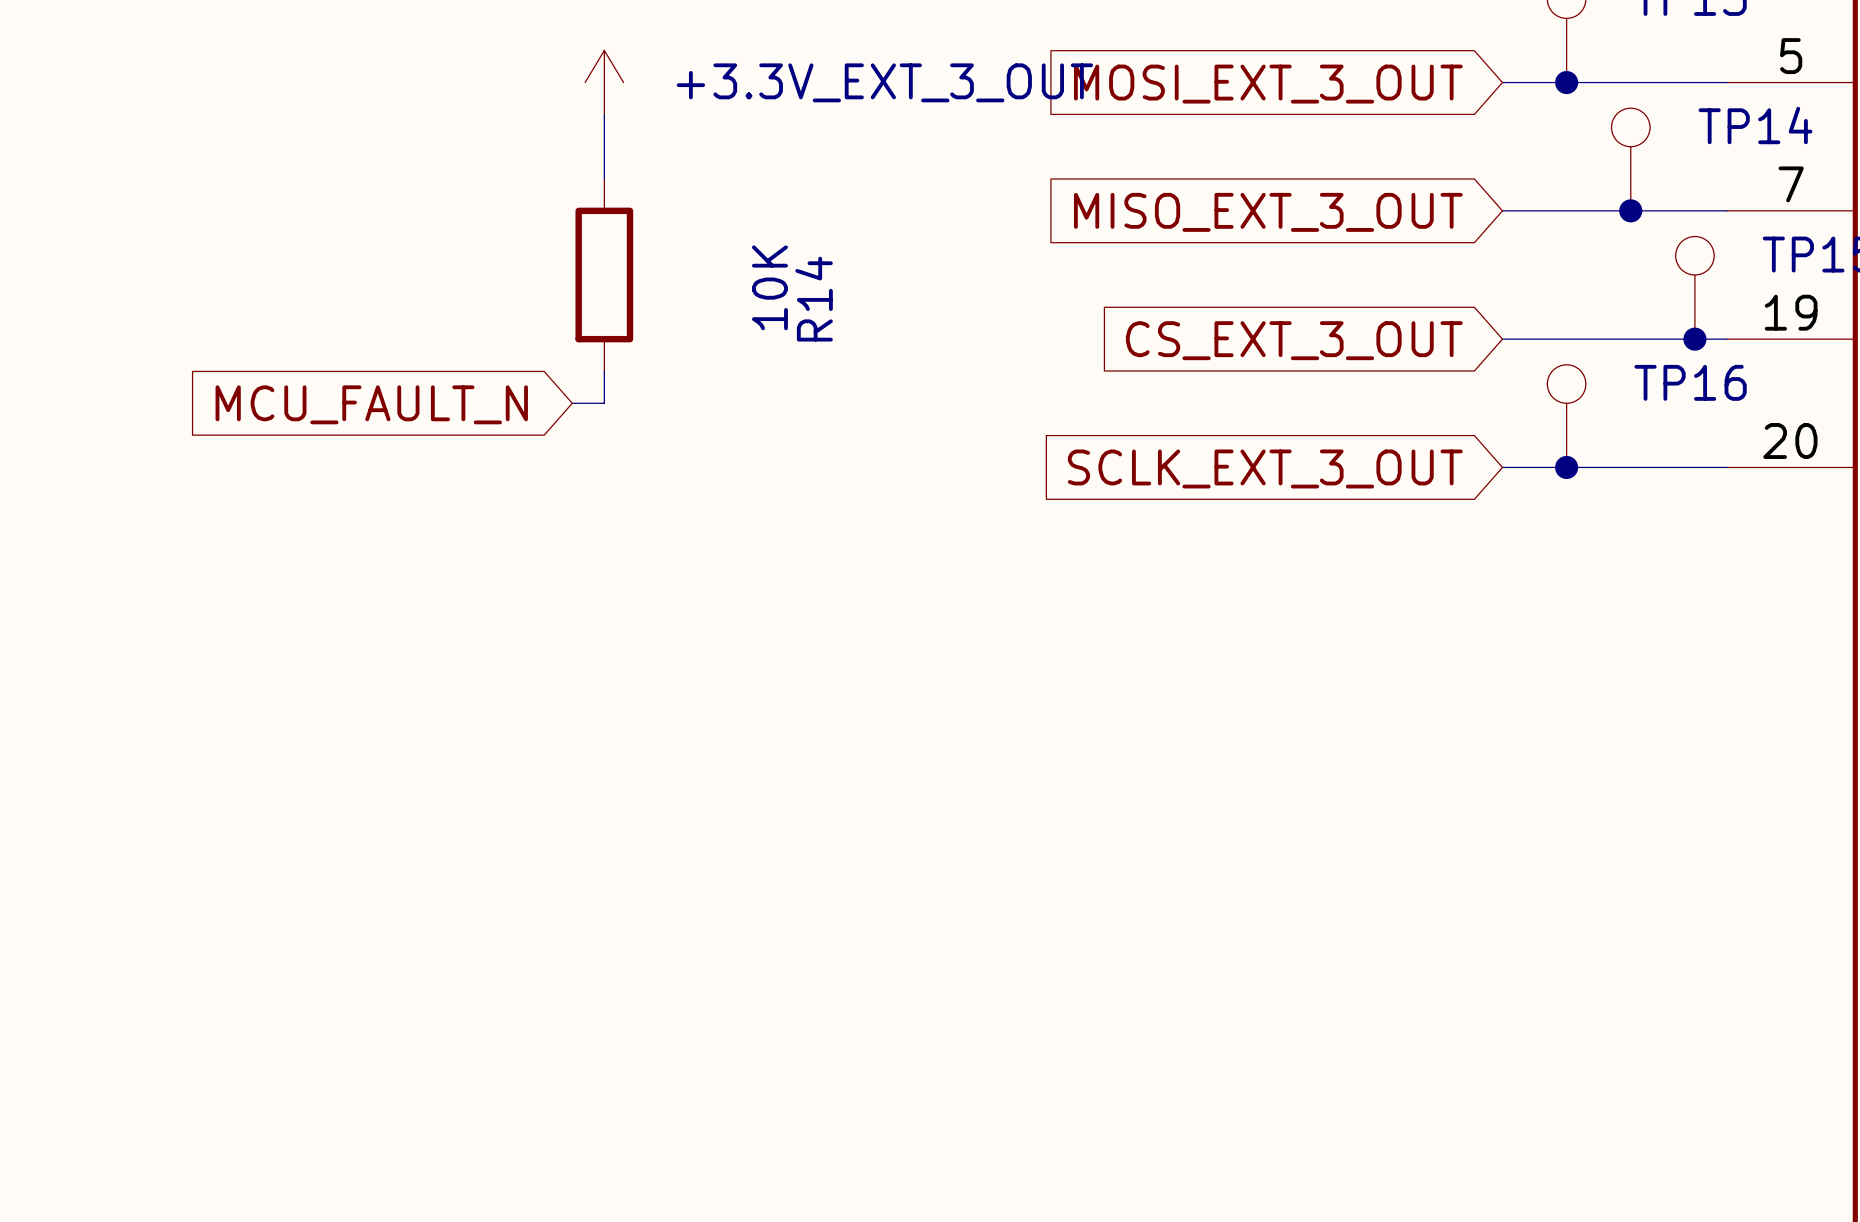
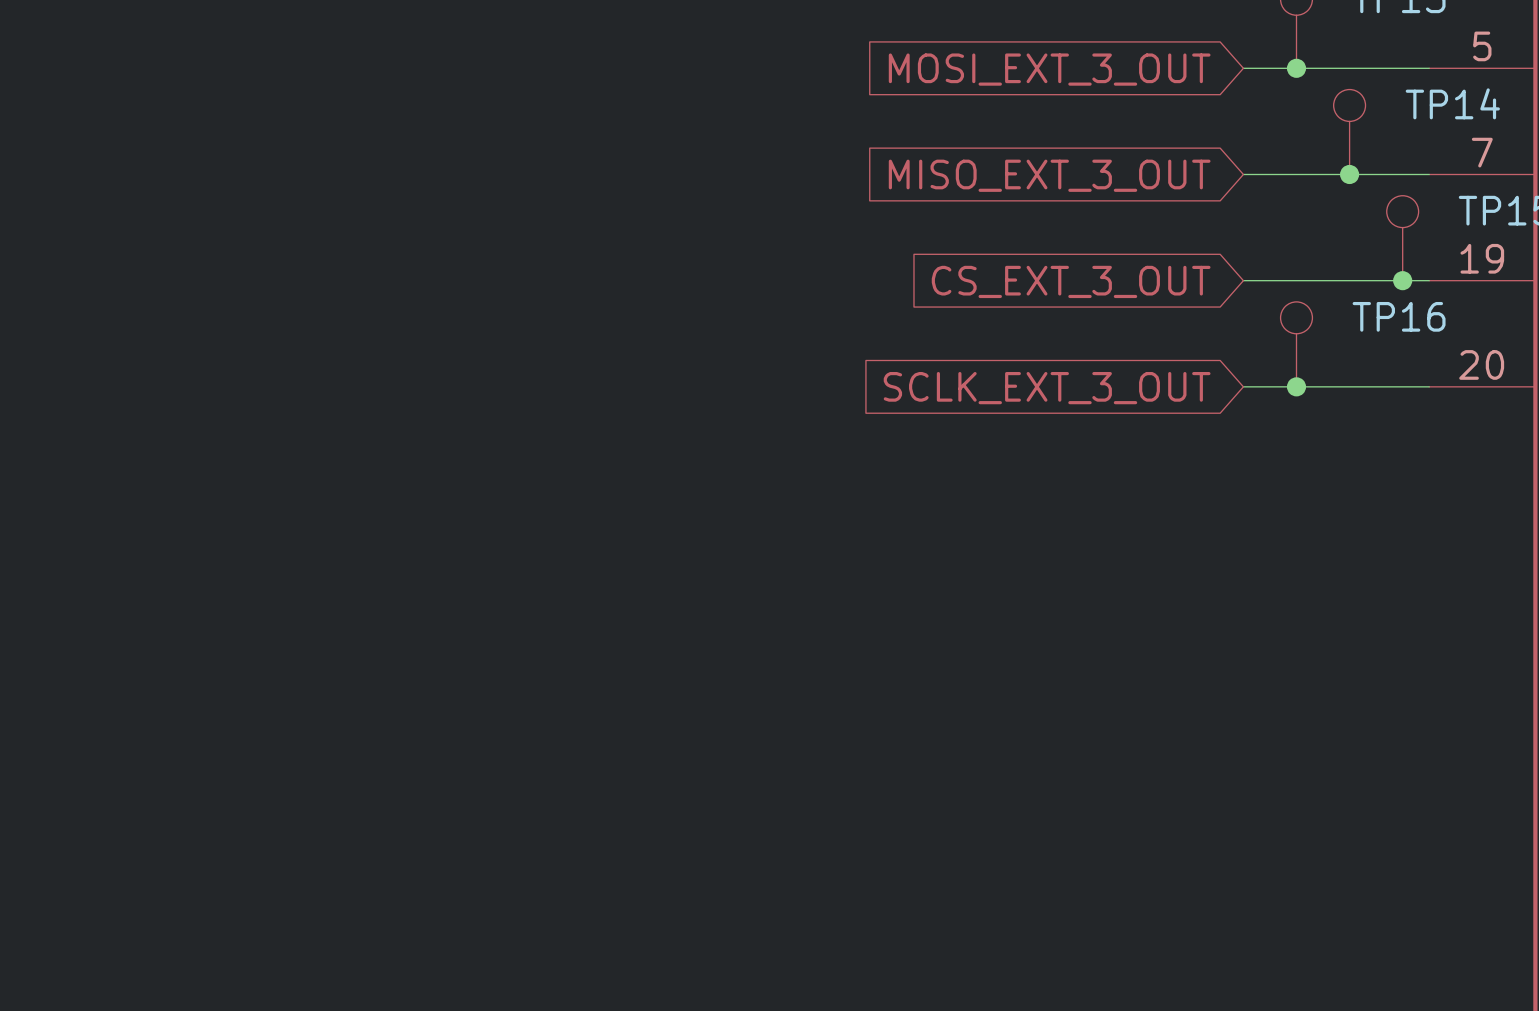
power symbol: +3.3V_EXT_3_OUT (604, 82) -> none
wire: (604, 114) (604, 178) -> none
R14: 10K (604, 275) -> none
wire: (604, 371) (604, 403) (572, 403) -> none
global label: MCU_FAULT_N (371, 404) -> none

